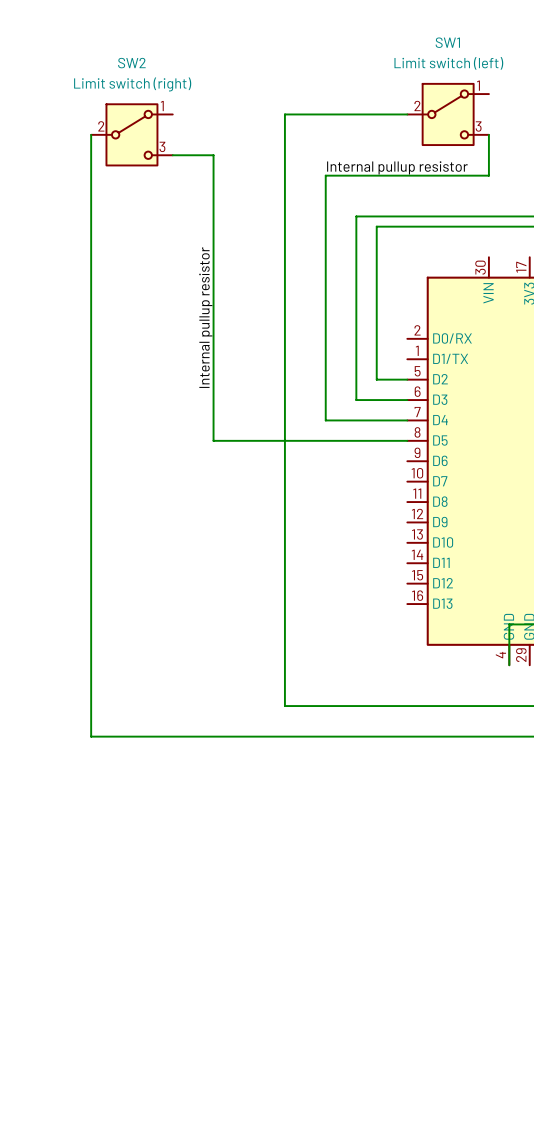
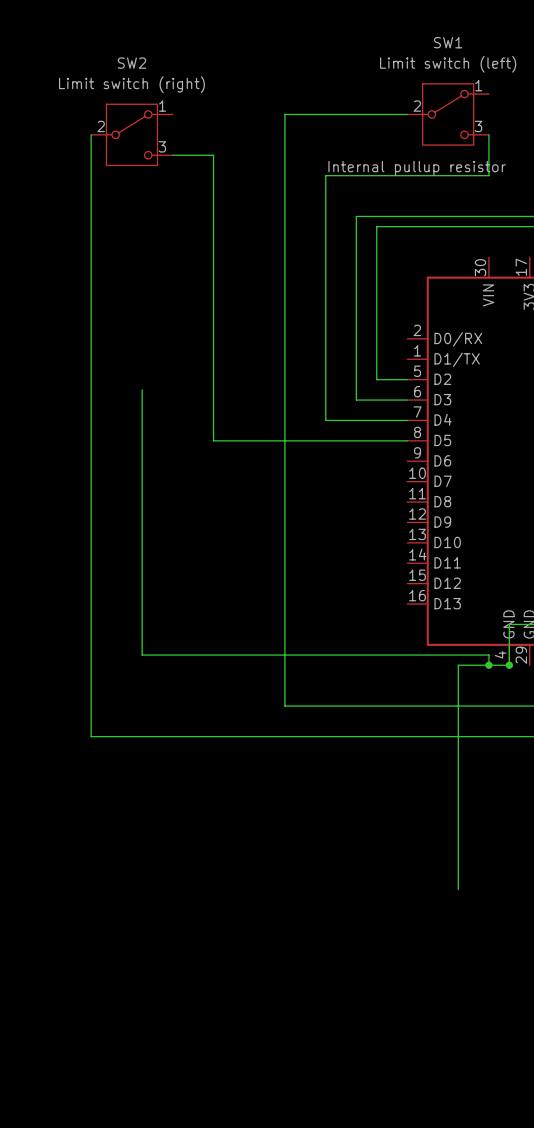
label: Internal pullup resistor (205, 317) -> none
wire: none -> (142, 389) (142, 655) (488, 655) (488, 665)
junction: none -> (488, 665)
wire: none -> (509, 665) (458, 665) (458, 889)
junction: none -> (509, 665)

